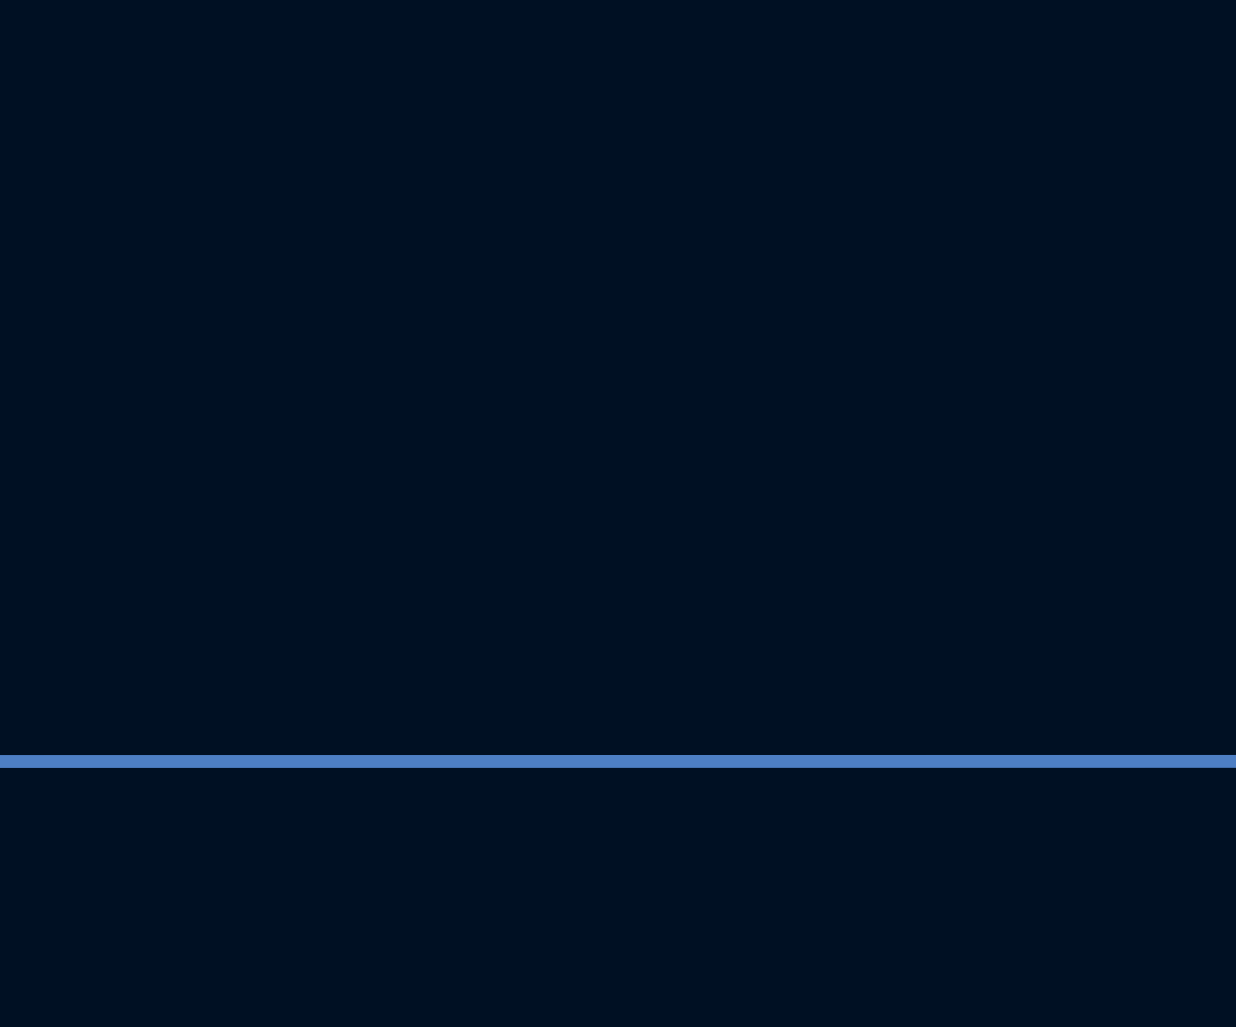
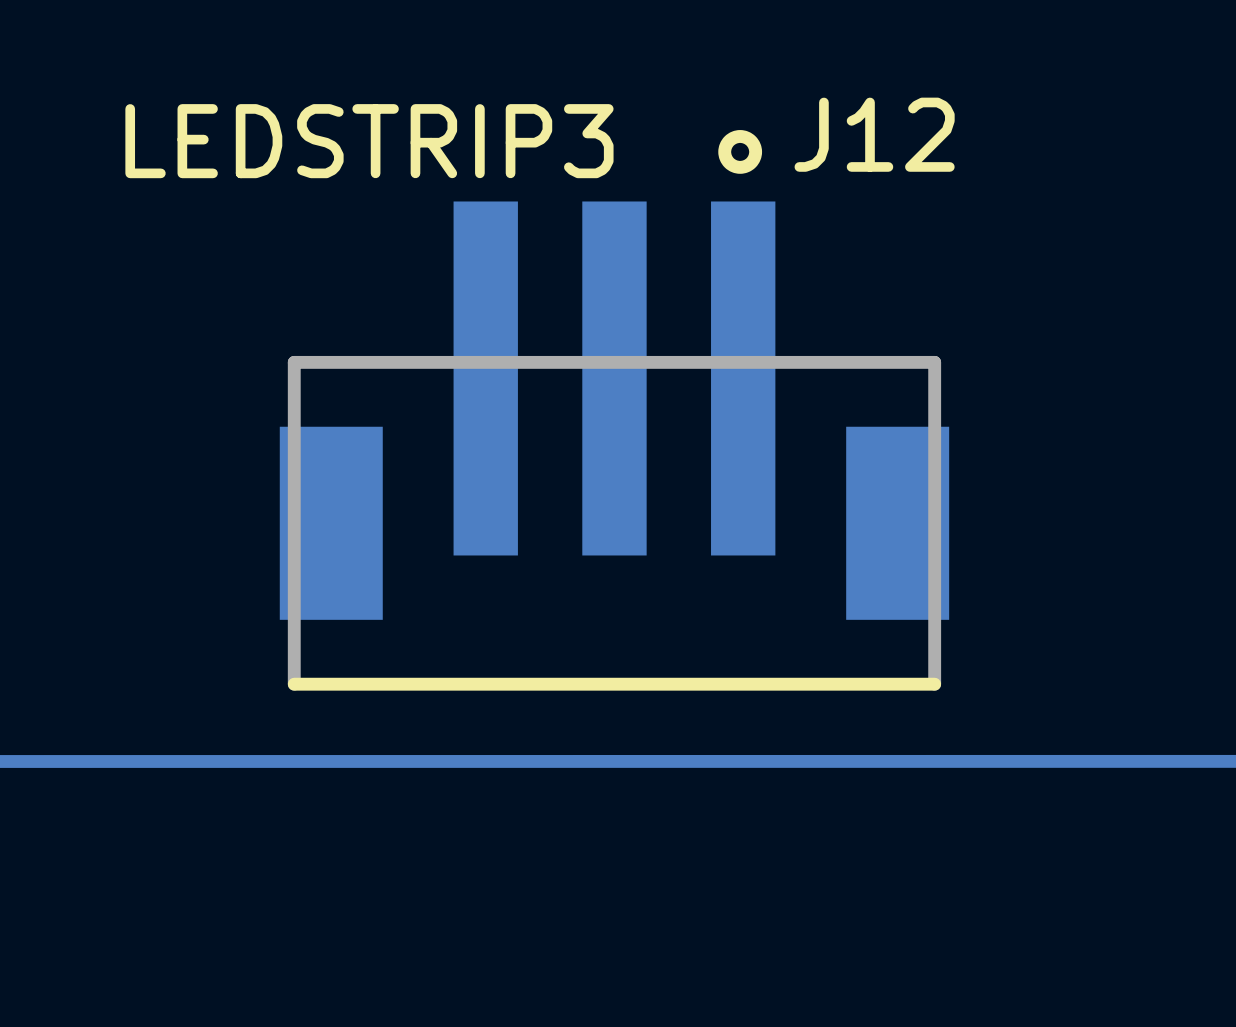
J12: none -> LEDSTRIP3 (614, 410)

